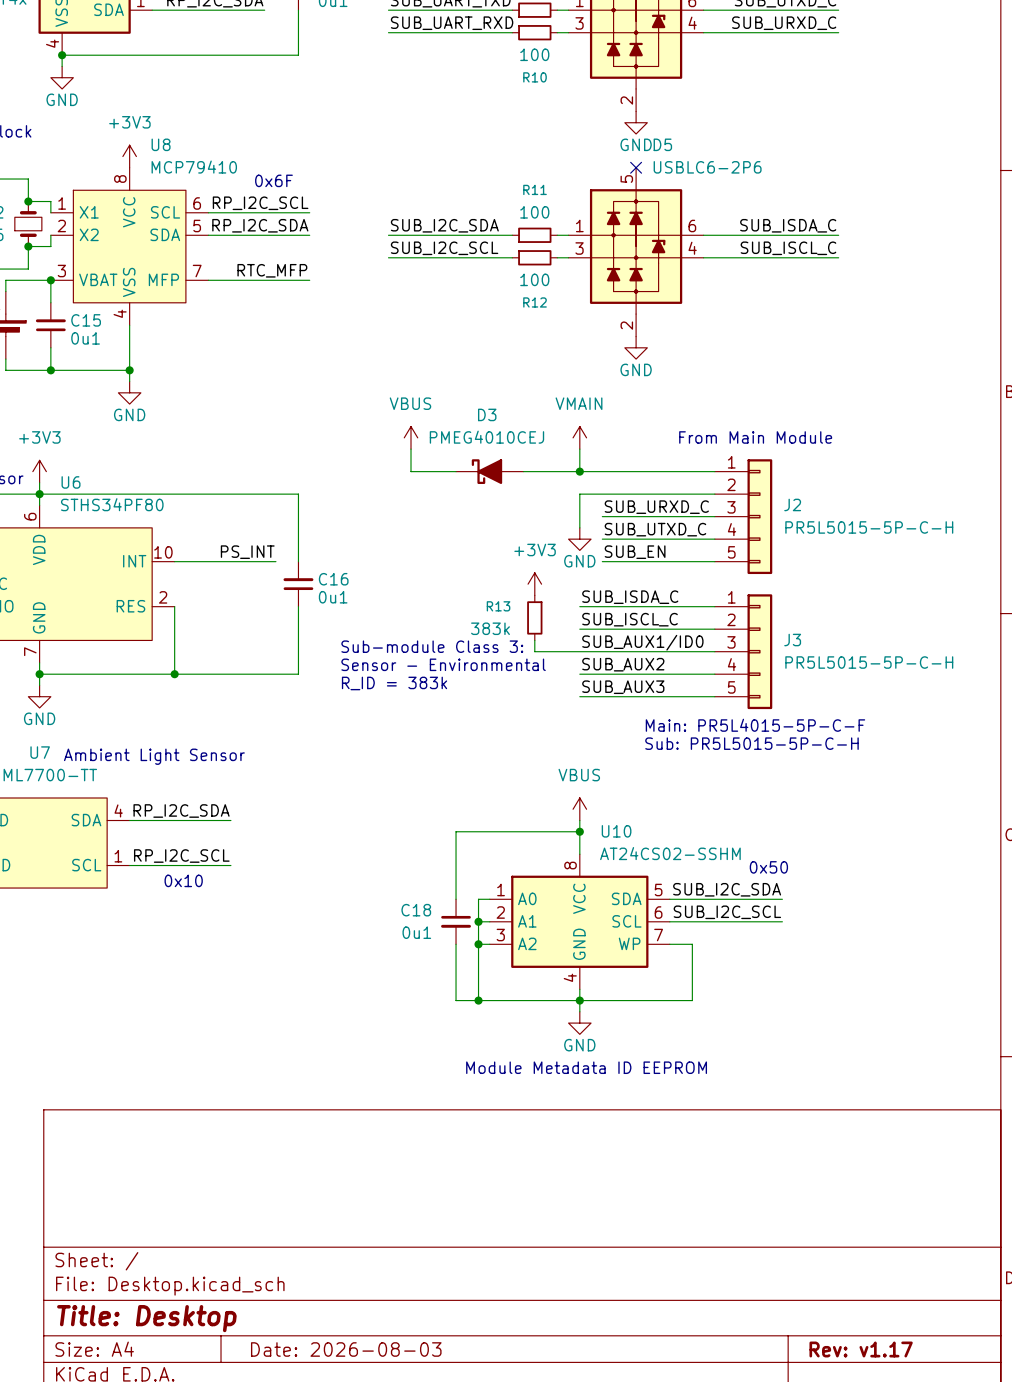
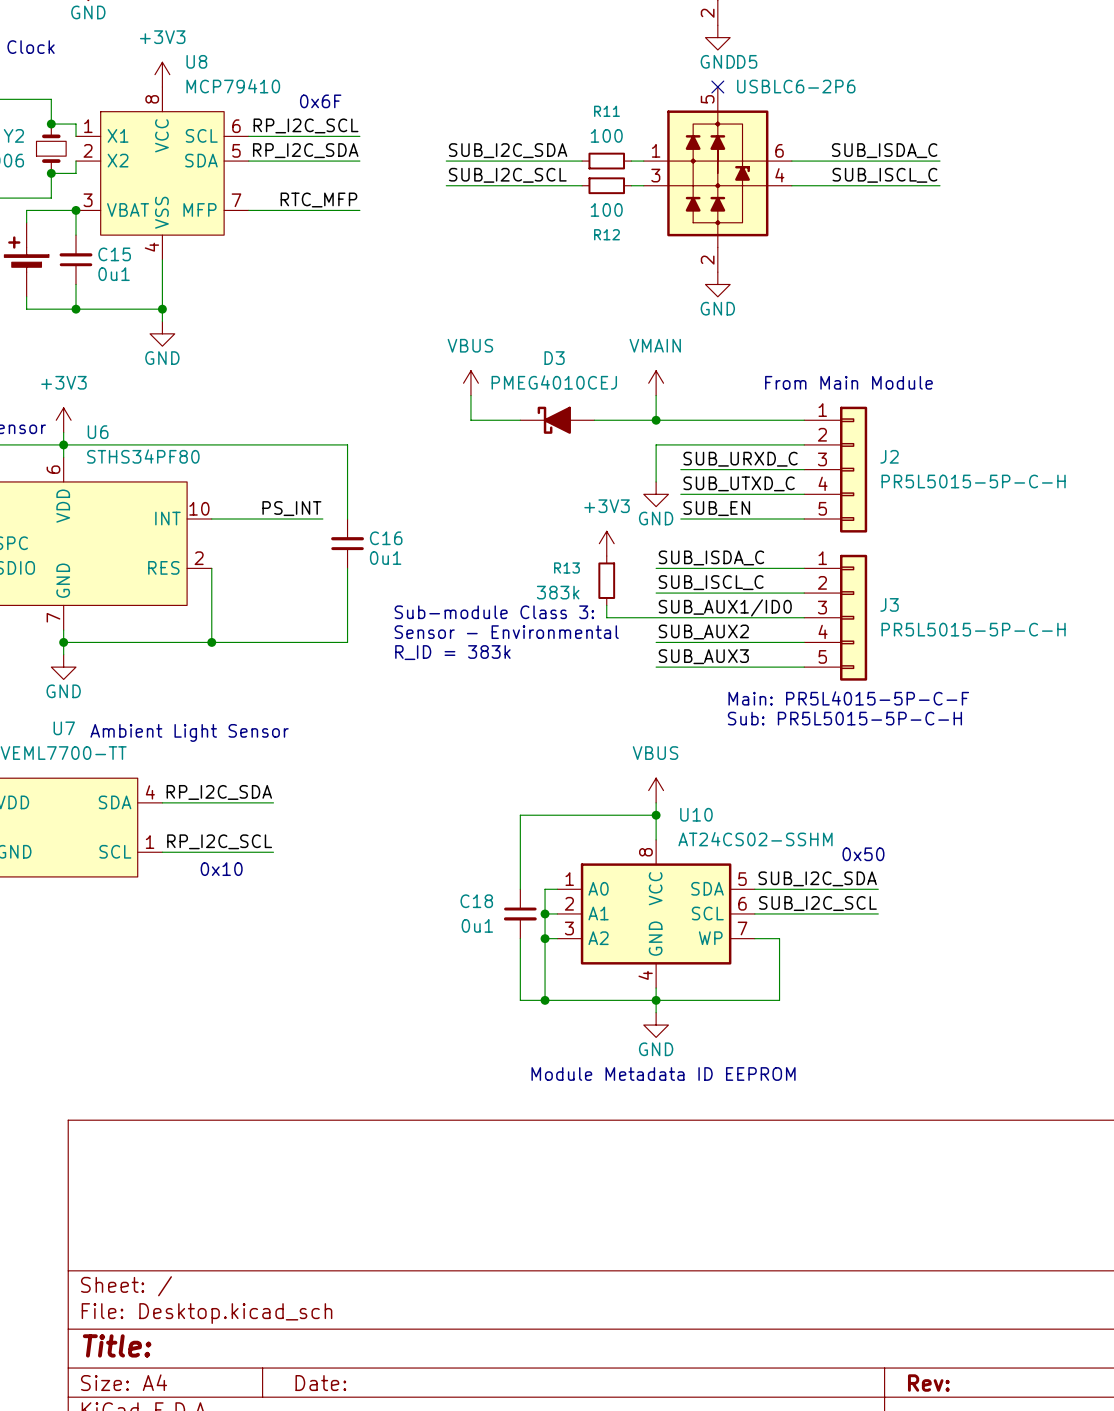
title block: Title: Desktop (146, 1318) -> Title: (117, 1345)
title block: Date: 2026-08-03 (346, 1349) -> Date: (320, 1383)
title block: Rev: v1.17 (861, 1349) -> Rev: (928, 1383)

